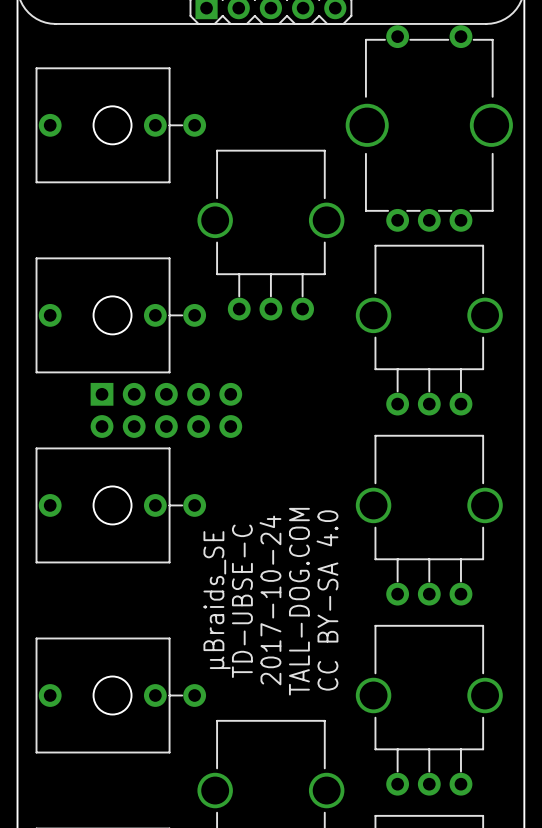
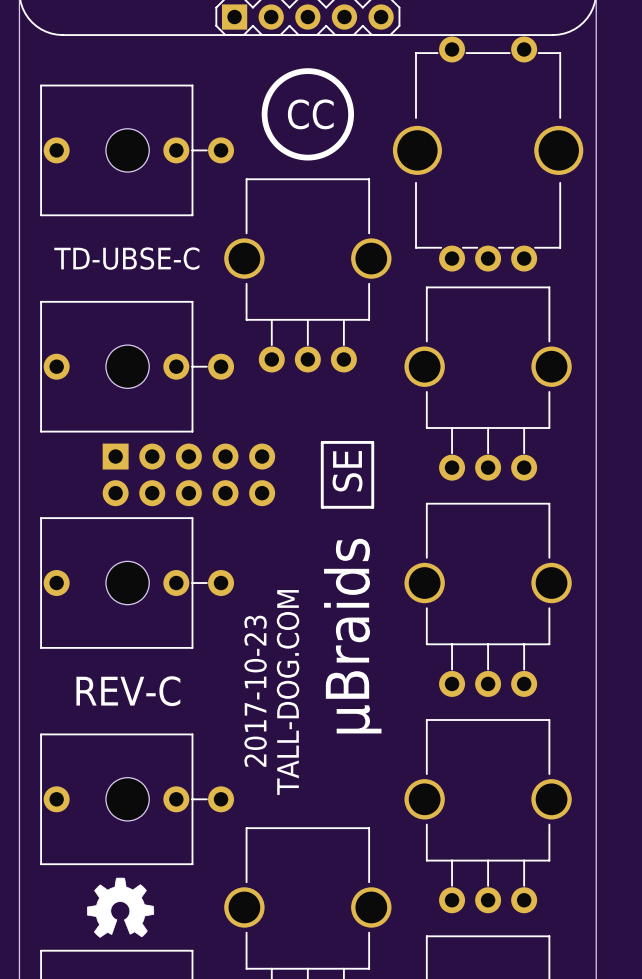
drawing: none -> [261, 68, 354, 161]
text: none -> TD-UBSE-C (126, 258)
drawing: none -> [320, 440, 375, 509]
text: none -> REV-C (128, 691)
text: µBraids_SE (217, 600) -> none
text: none -> 2017-10-23 (255, 691)
text: 2017-10-24 (270, 600) -> none
text: CC BY-SA 4.0 (327, 600) -> none
text: TD-UBSE-C (242, 601) -> none
text position: TALL-DOG.COM (299, 601) -> TALL-DOG.COM (288, 692)
drawing: none -> [87, 877, 155, 938]

